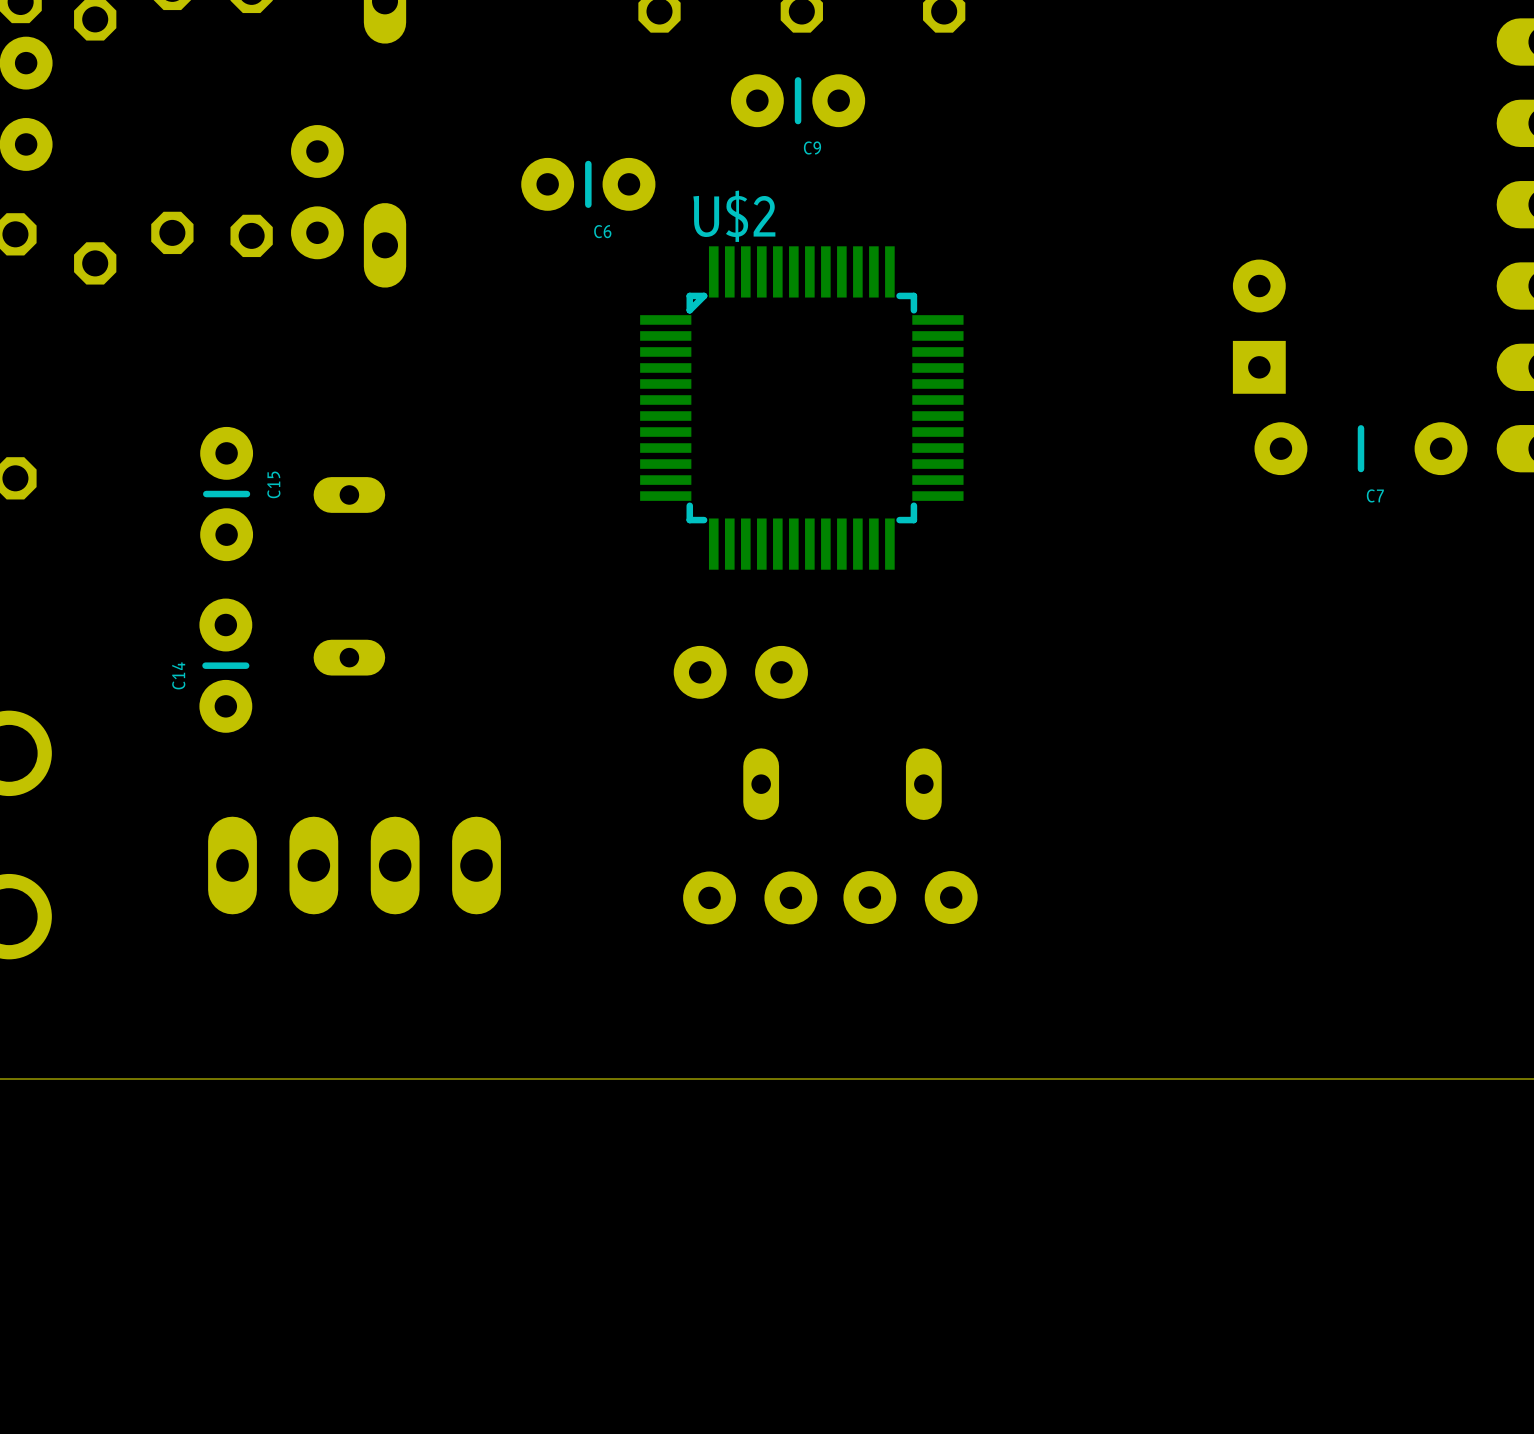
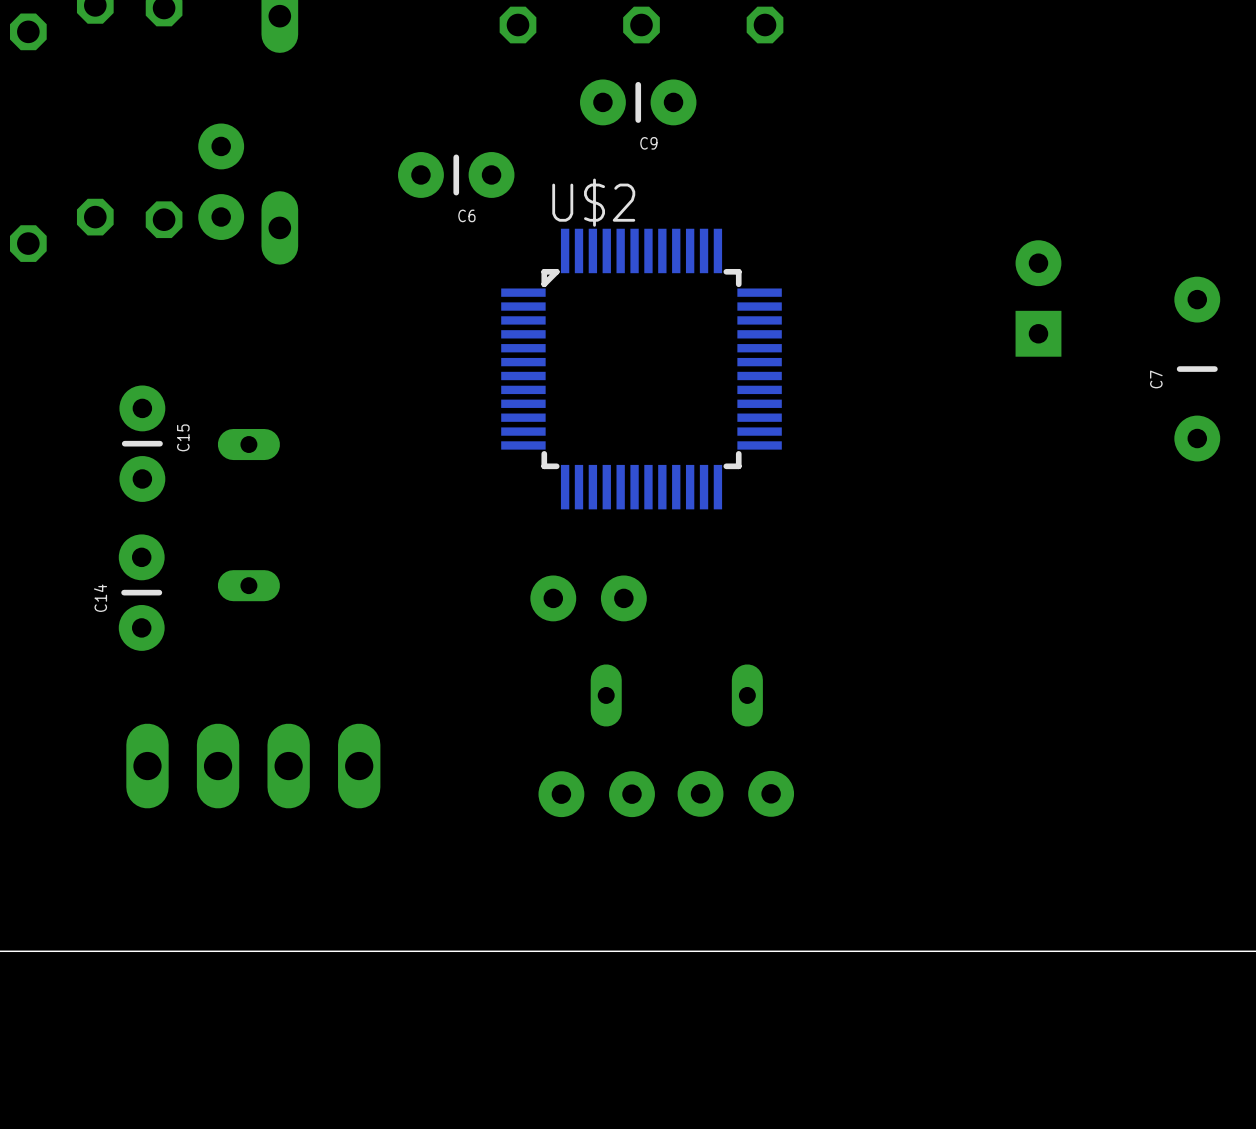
C7 rotation: 0° (1360, 448) -> 90° clockwise (1197, 369)

